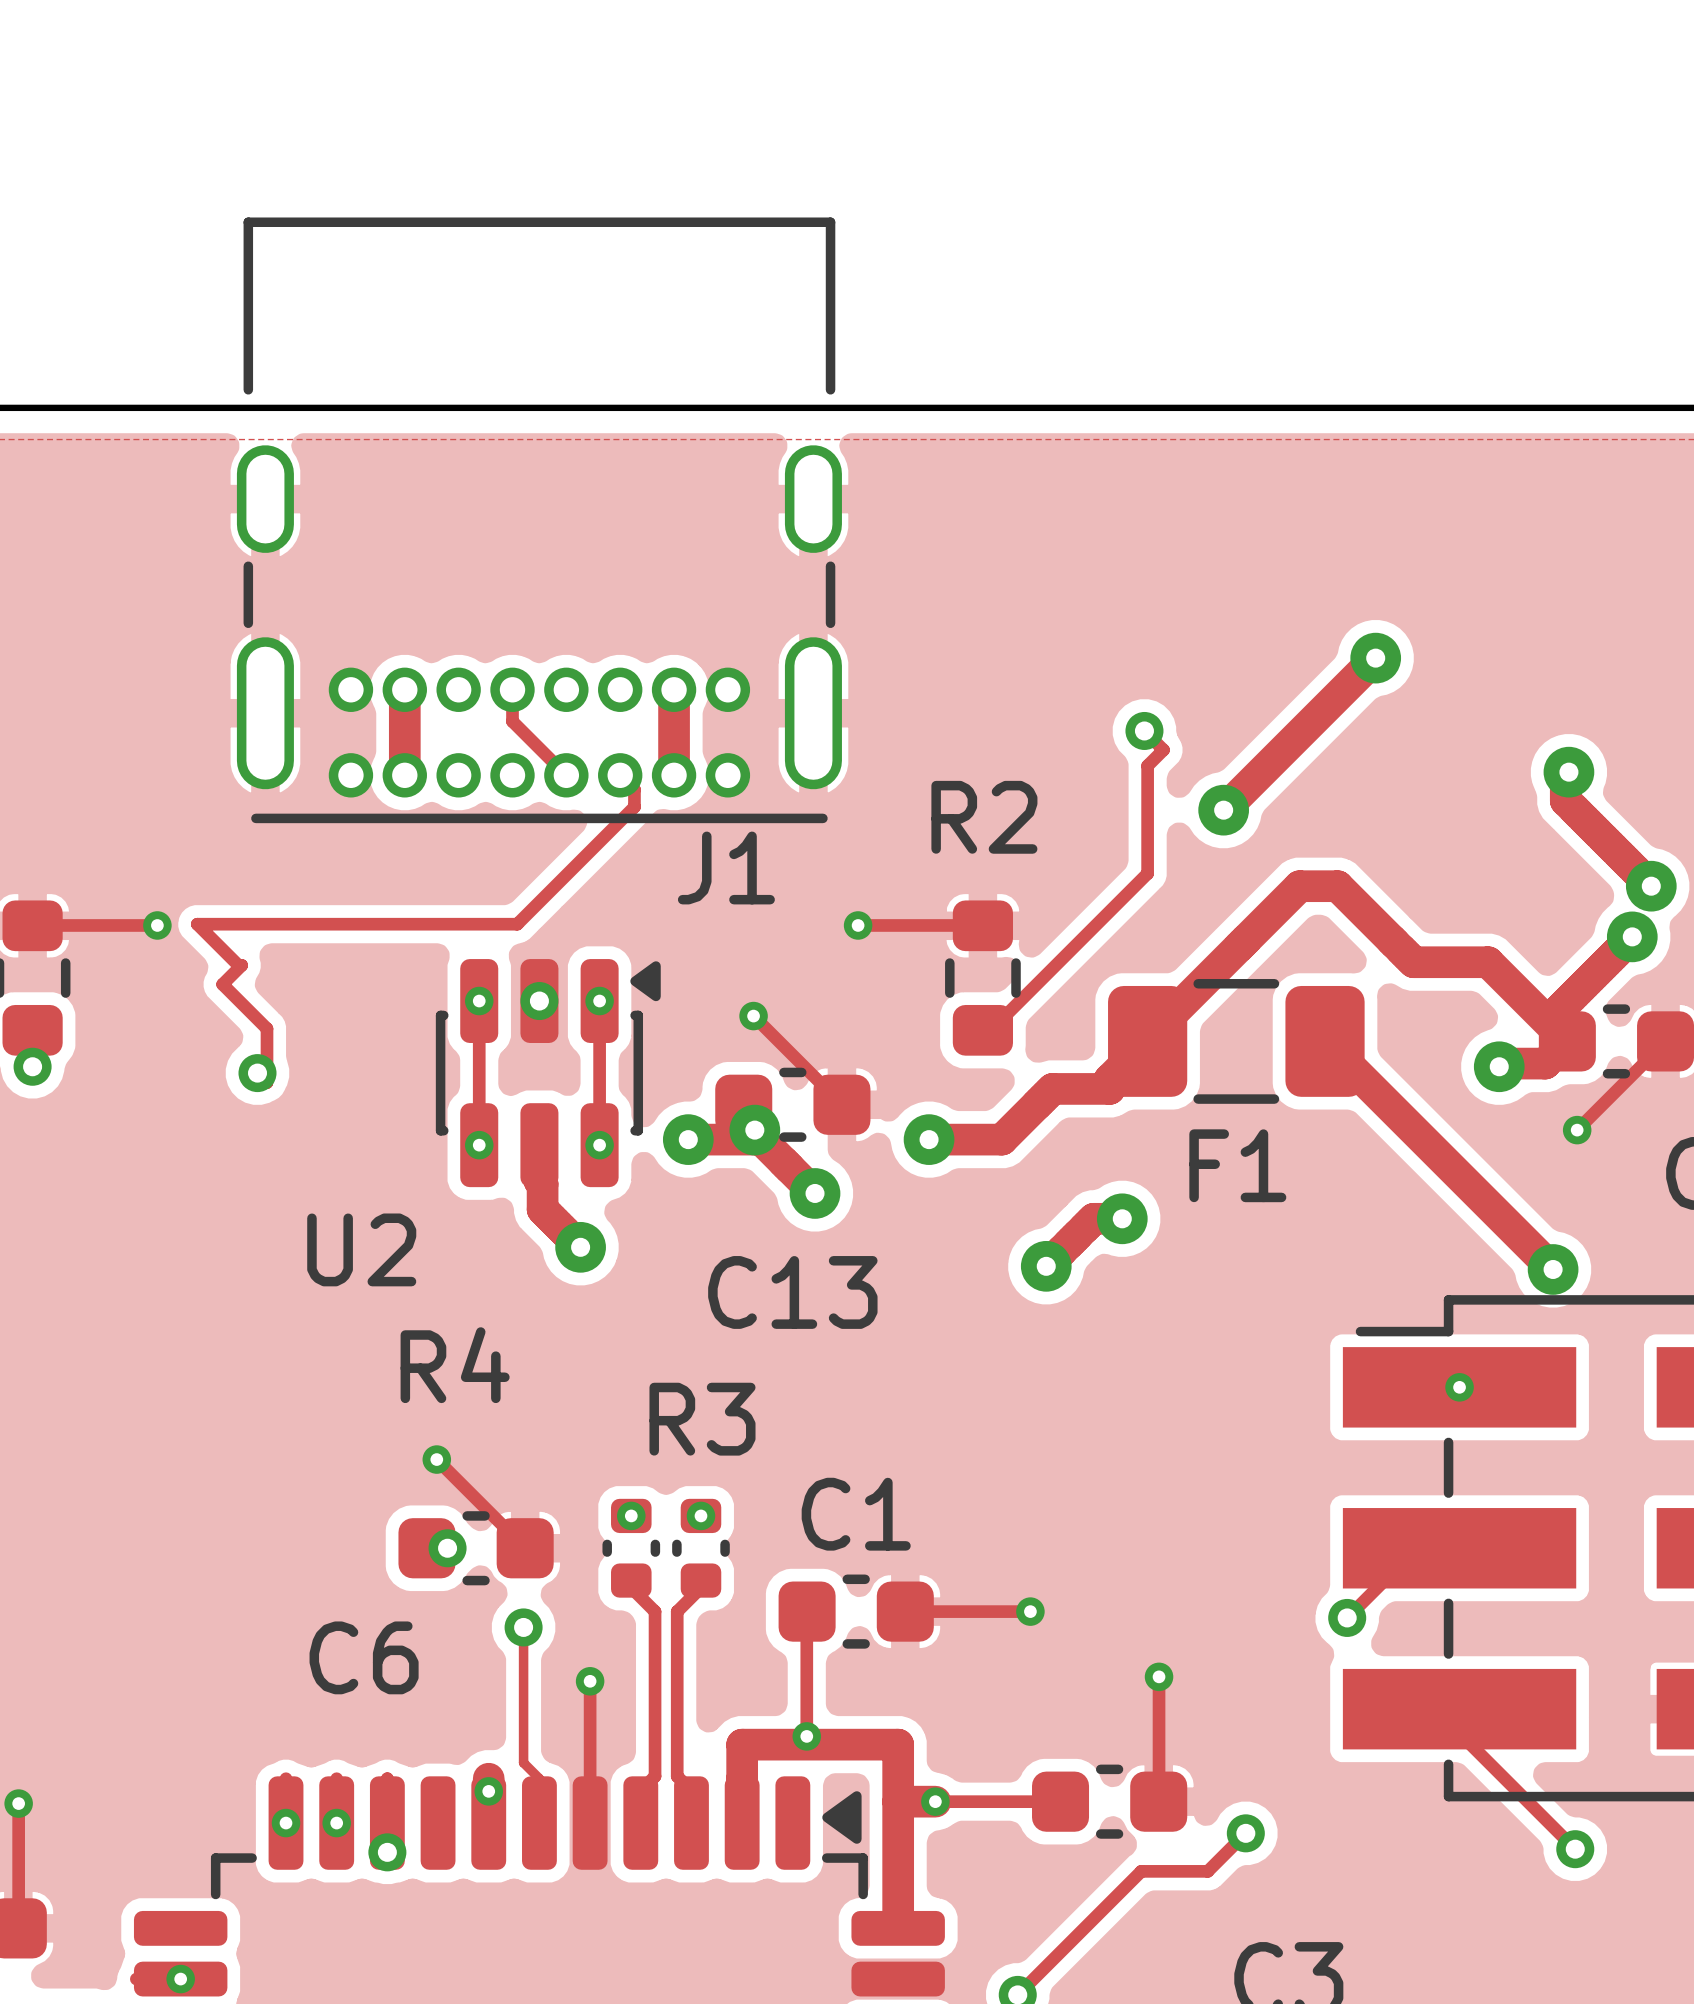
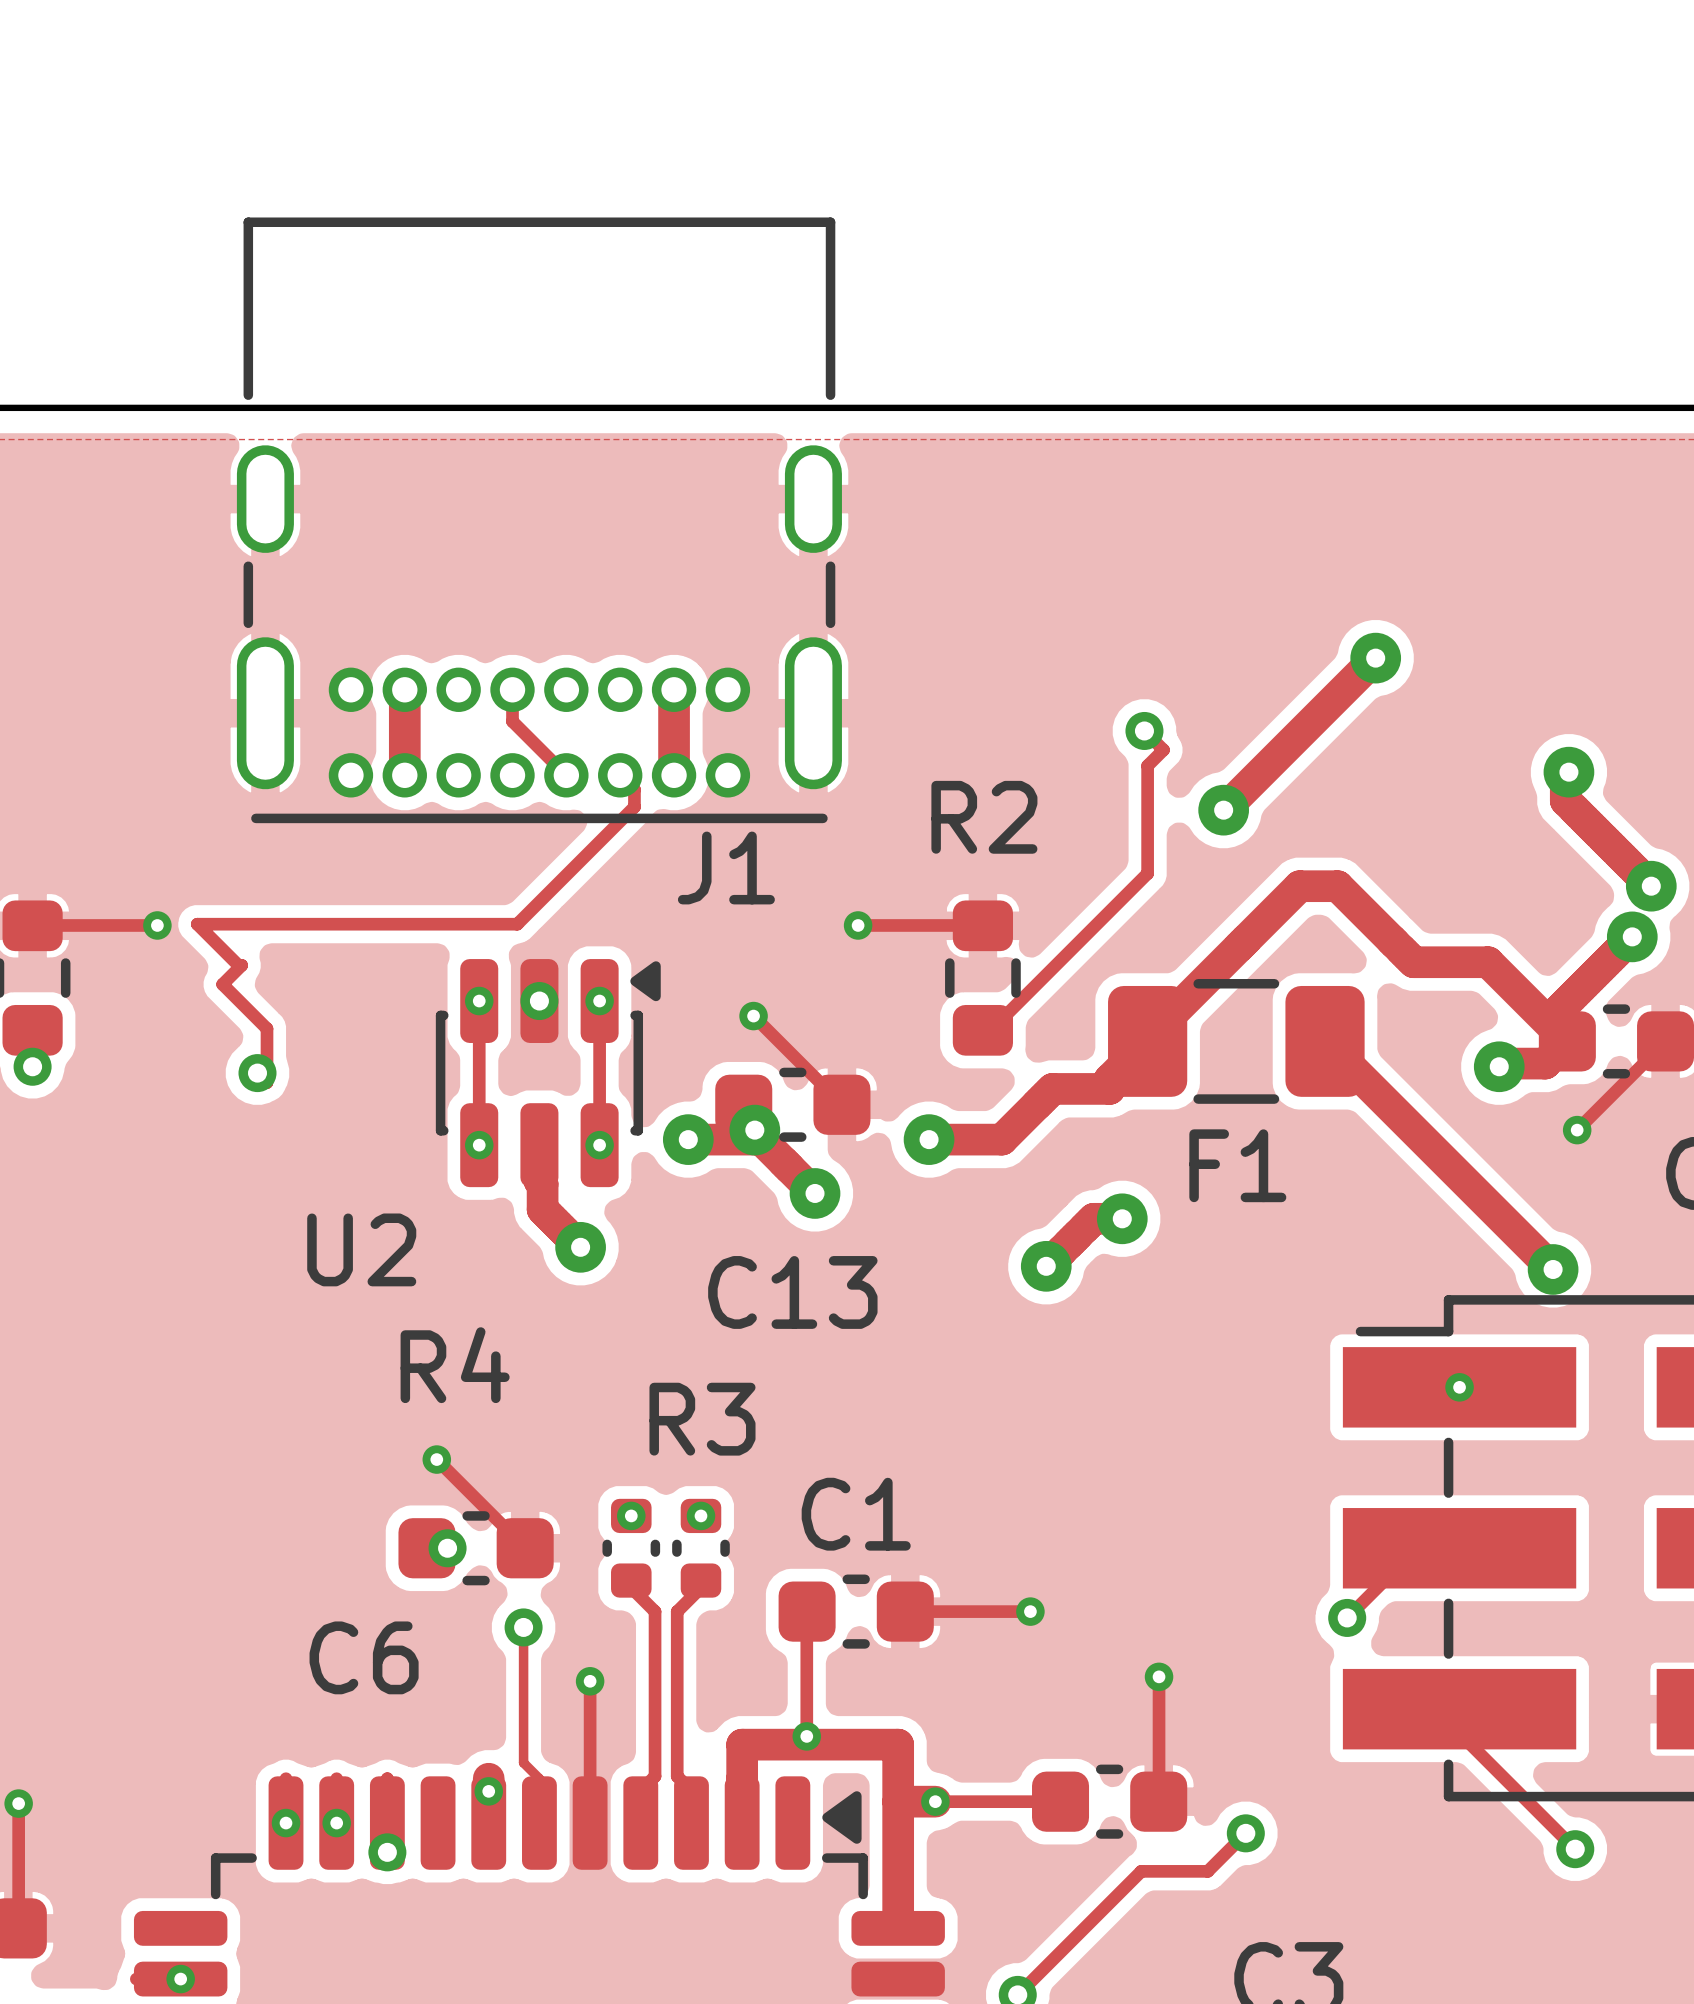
J1 footprint: [236, 217, 842, 824] -> [236, 217, 842, 824]

